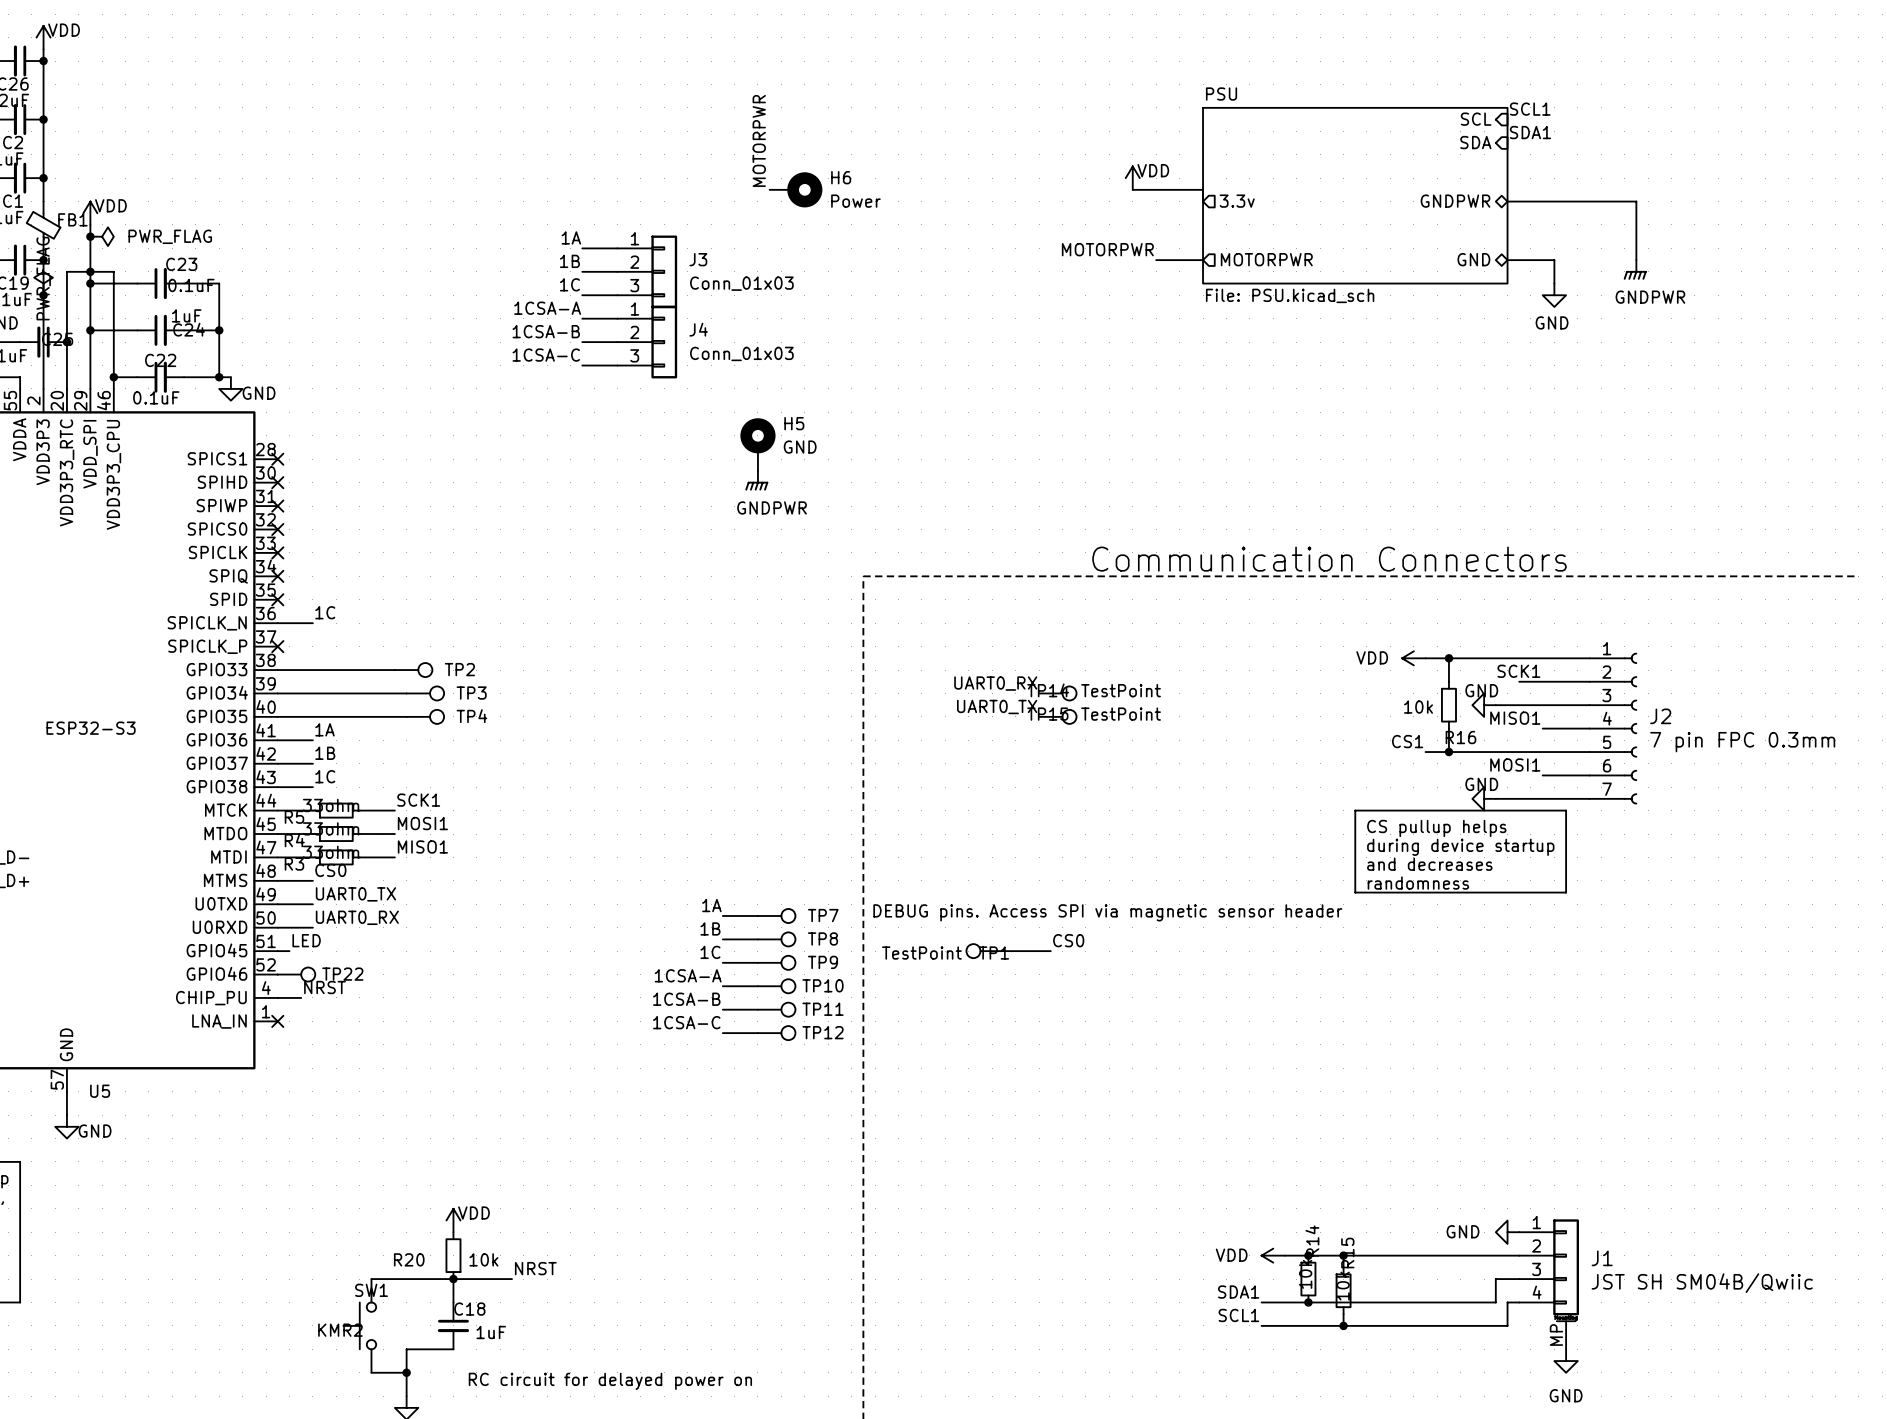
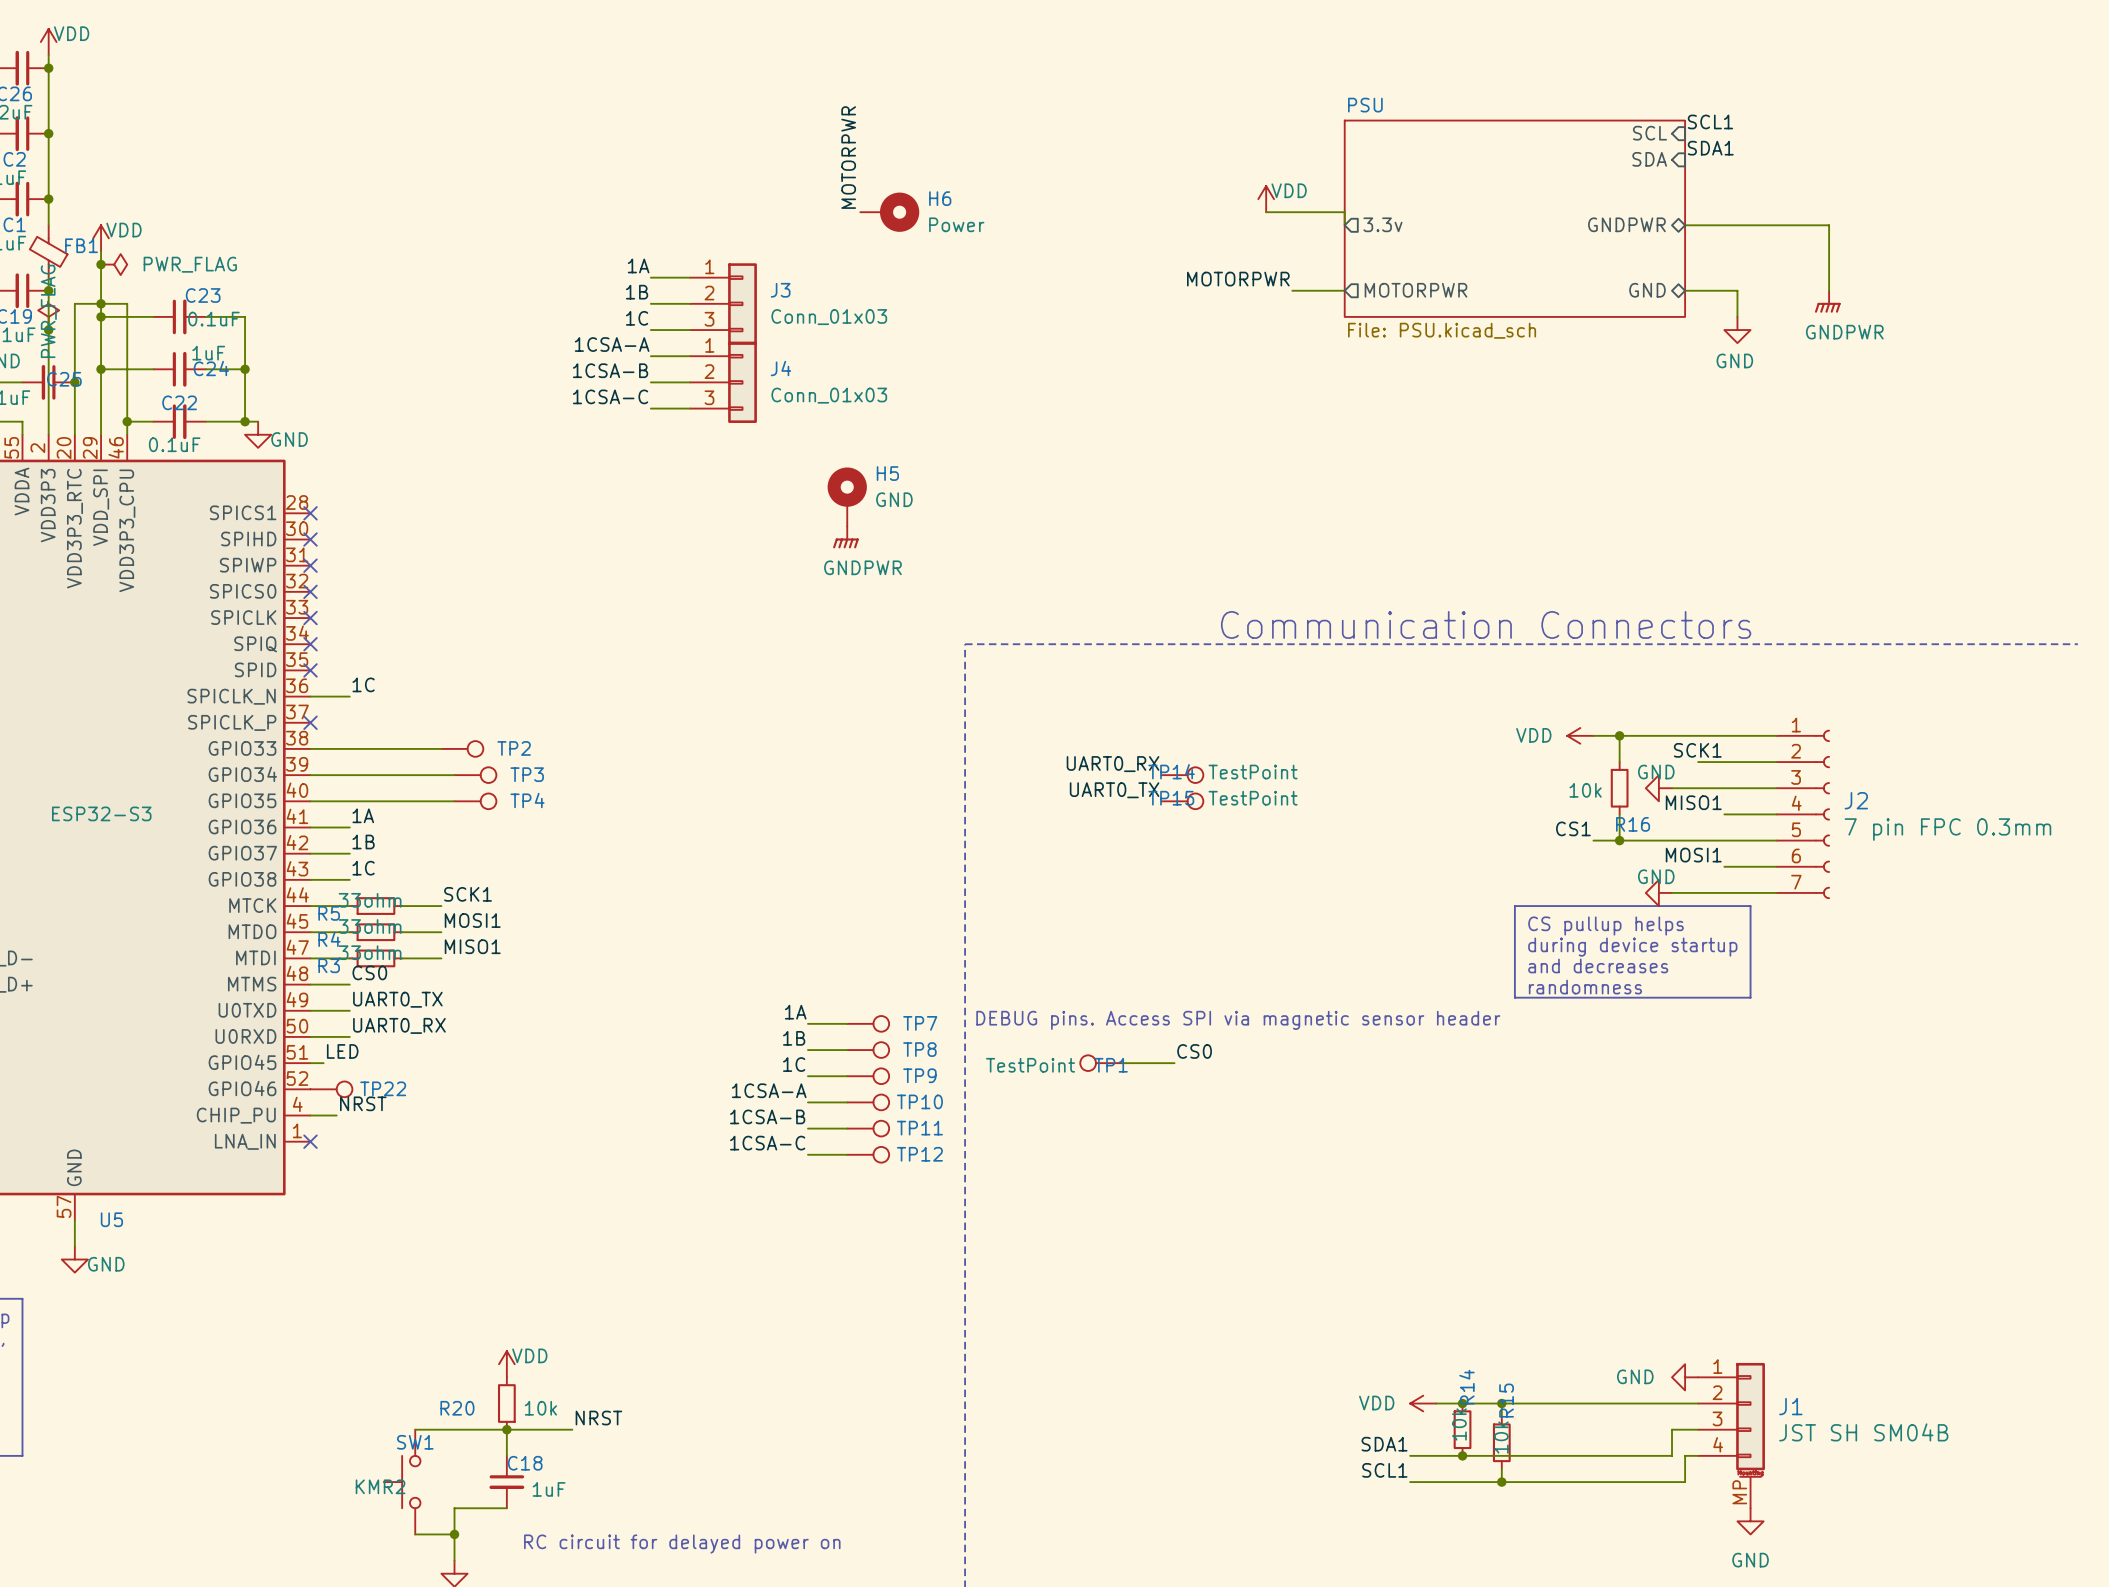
J1 value: JST SH SM04B/Qwiic (1702, 1283) -> JST SH SM04B (1863, 1432)

